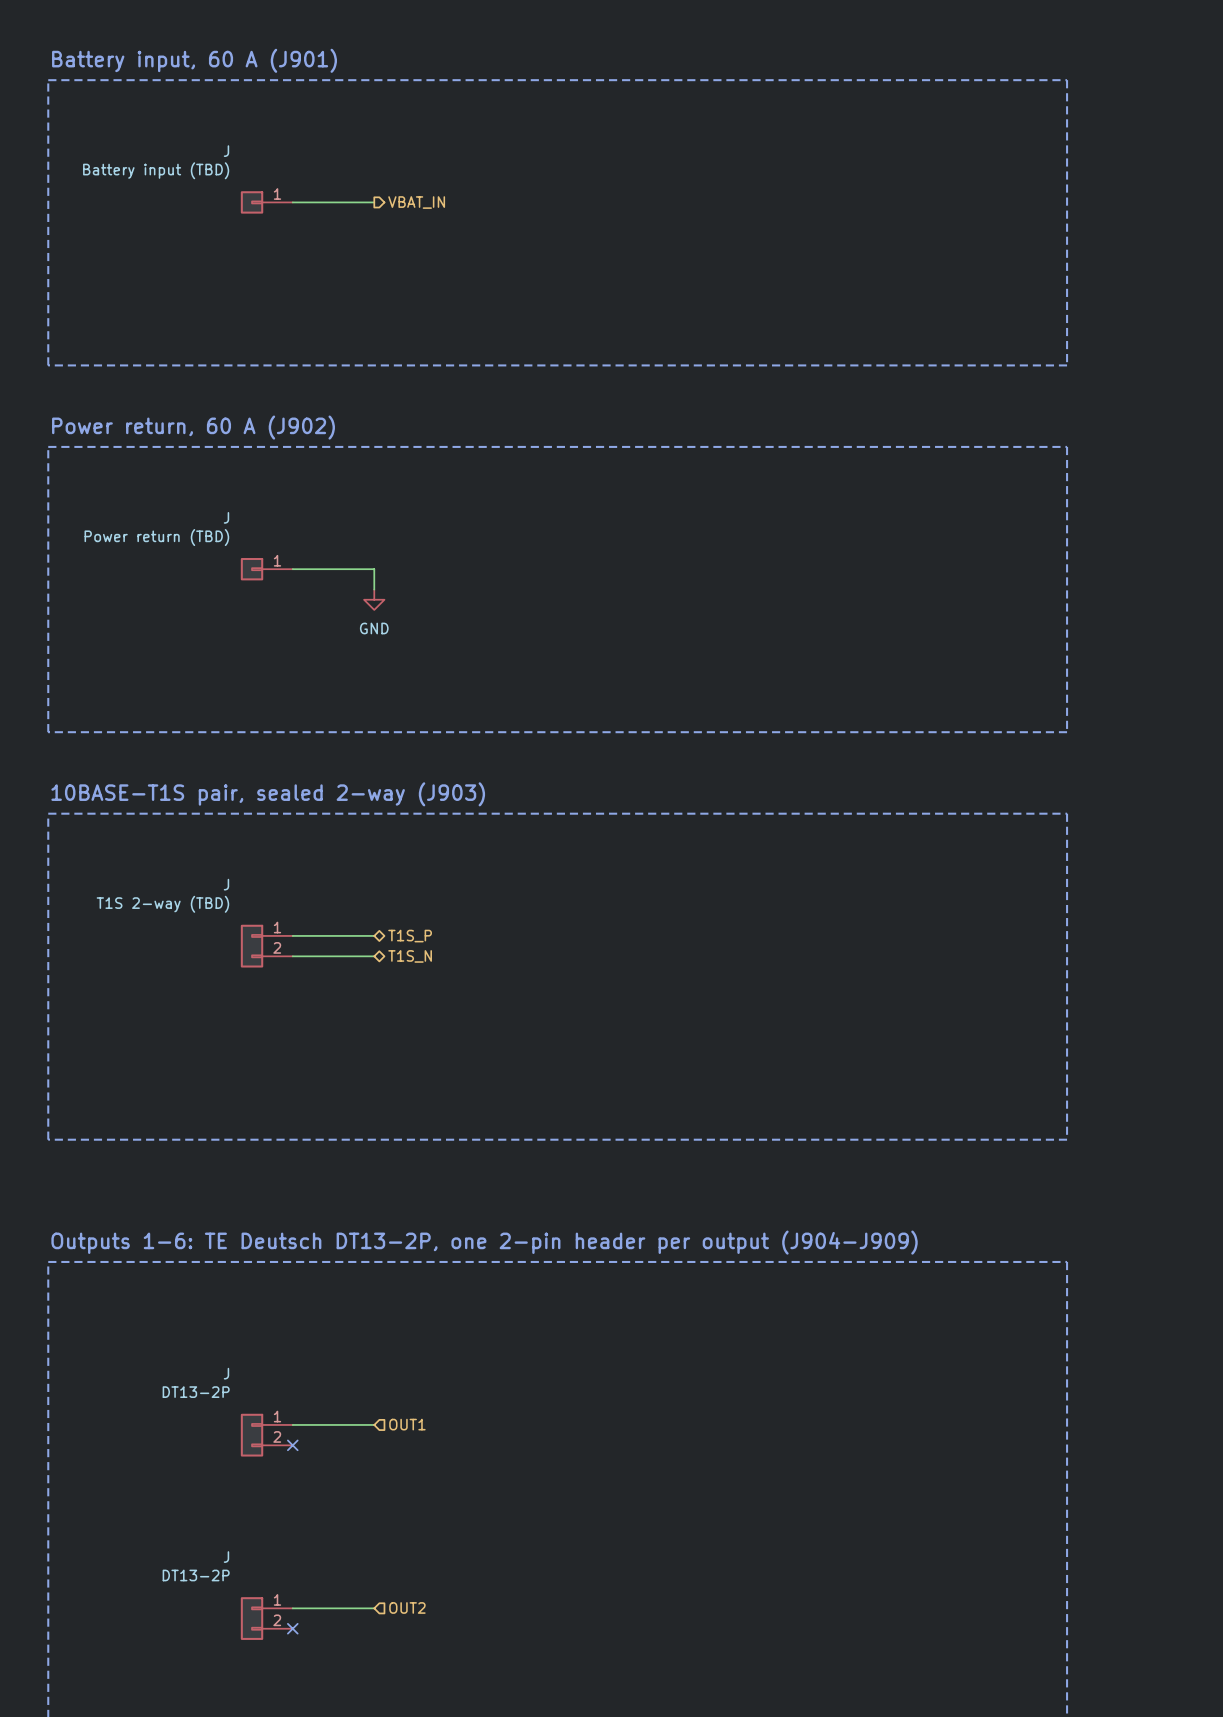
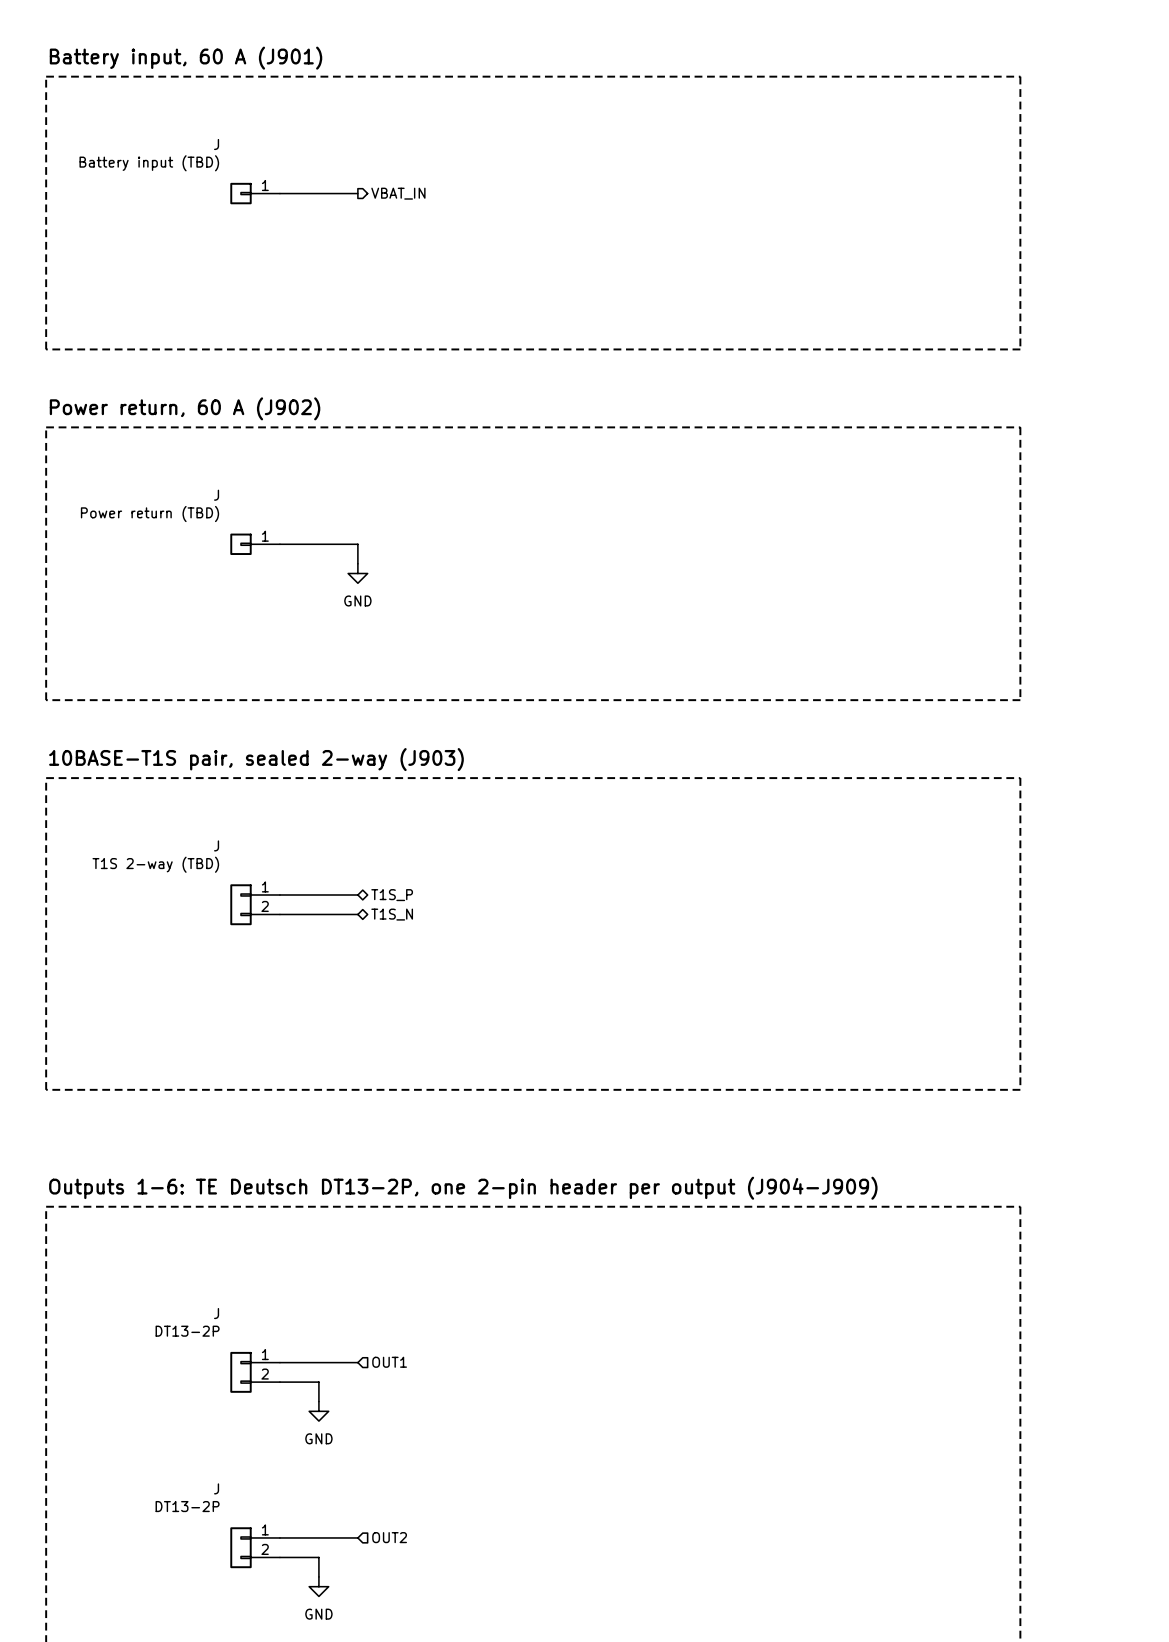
wire: none -> (279, 1382) (318, 1382) (318, 1401)
no-connect mark: (292, 1445) -> none
power symbol: none -> GND (318, 1411)
wire: none -> (279, 1557) (318, 1557) (318, 1576)
no-connect mark: (292, 1628) -> none
power symbol: none -> GND (318, 1586)

